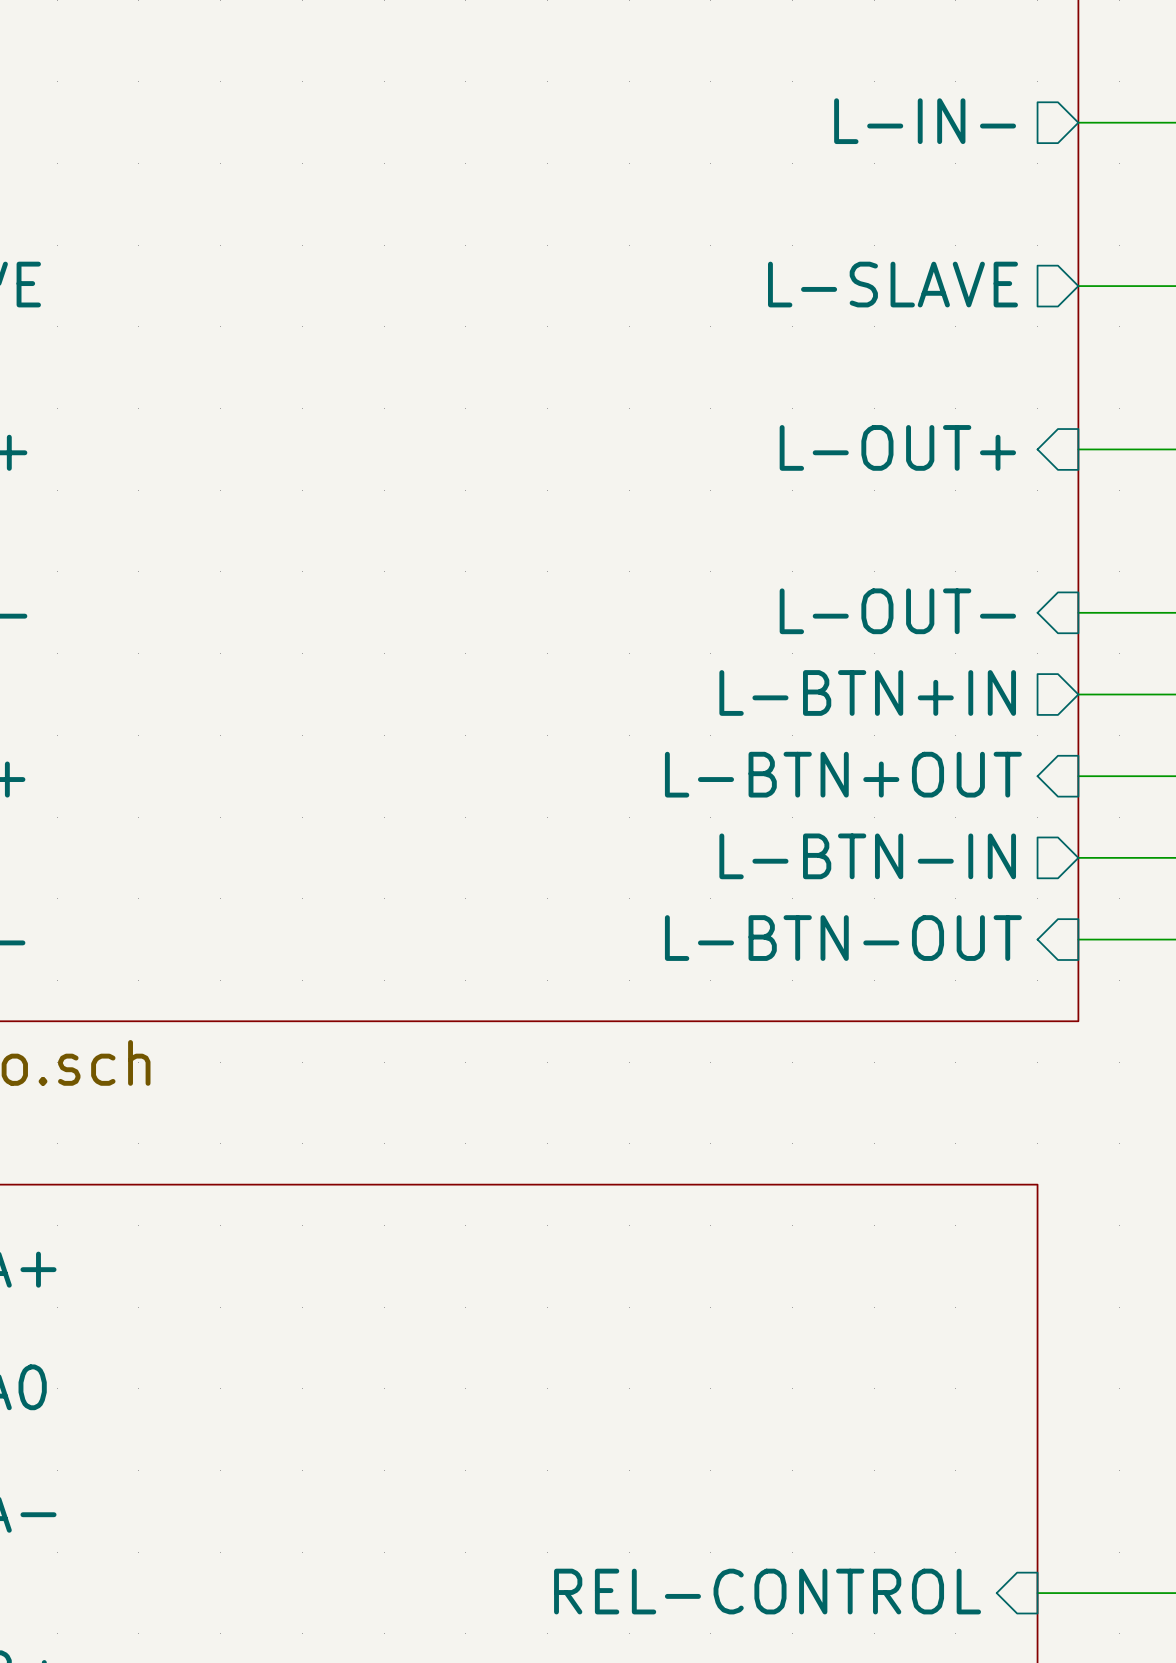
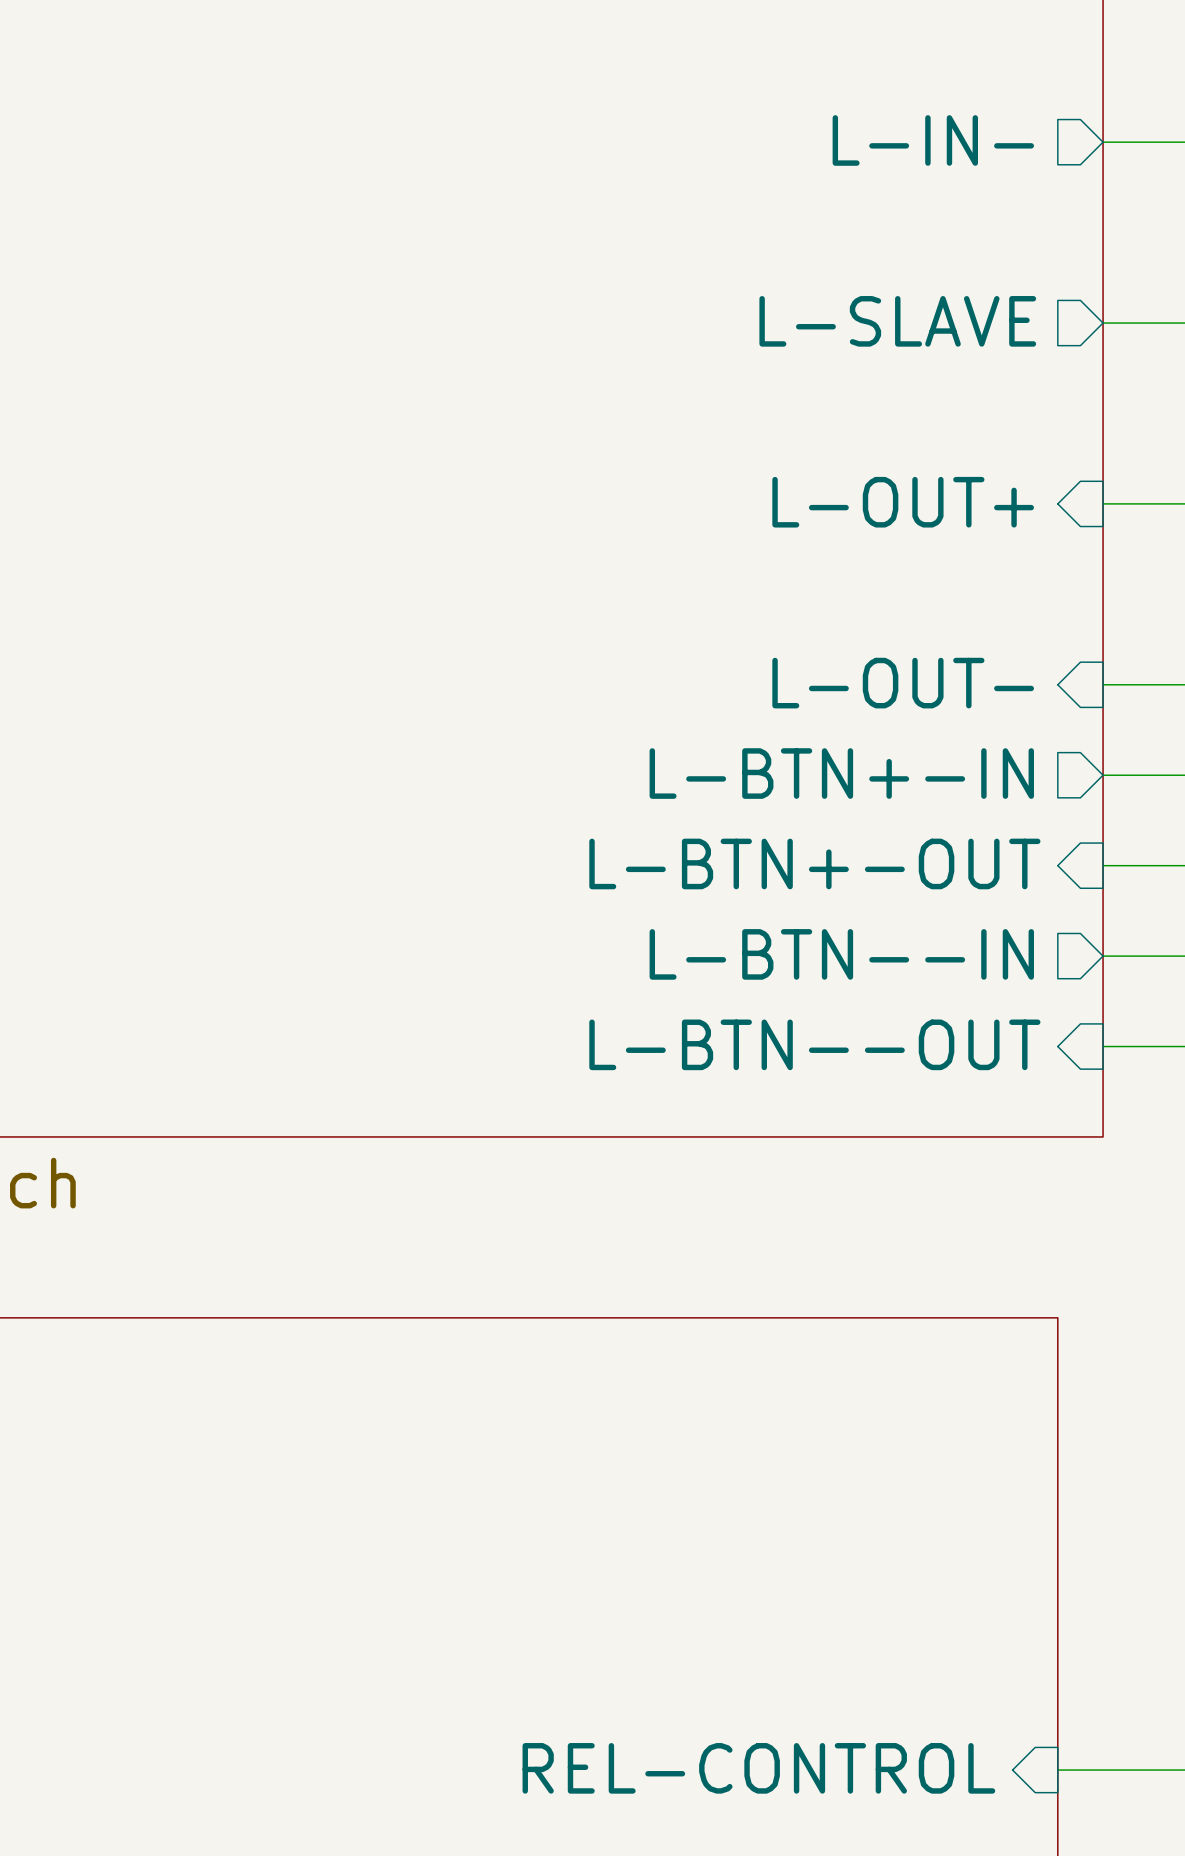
sheet pin: L-BTN+IN (867, 692) -> L-BTN+-IN (841, 773)
sheet pin: L-BTN+OUT (843, 774) -> L-BTN+-OUT (814, 863)
sheet pin: L-BTN-IN (867, 856) -> L-BTN--IN (841, 954)
sheet pin: L-BTN-OUT (843, 938) -> L-BTN--OUT (814, 1044)

